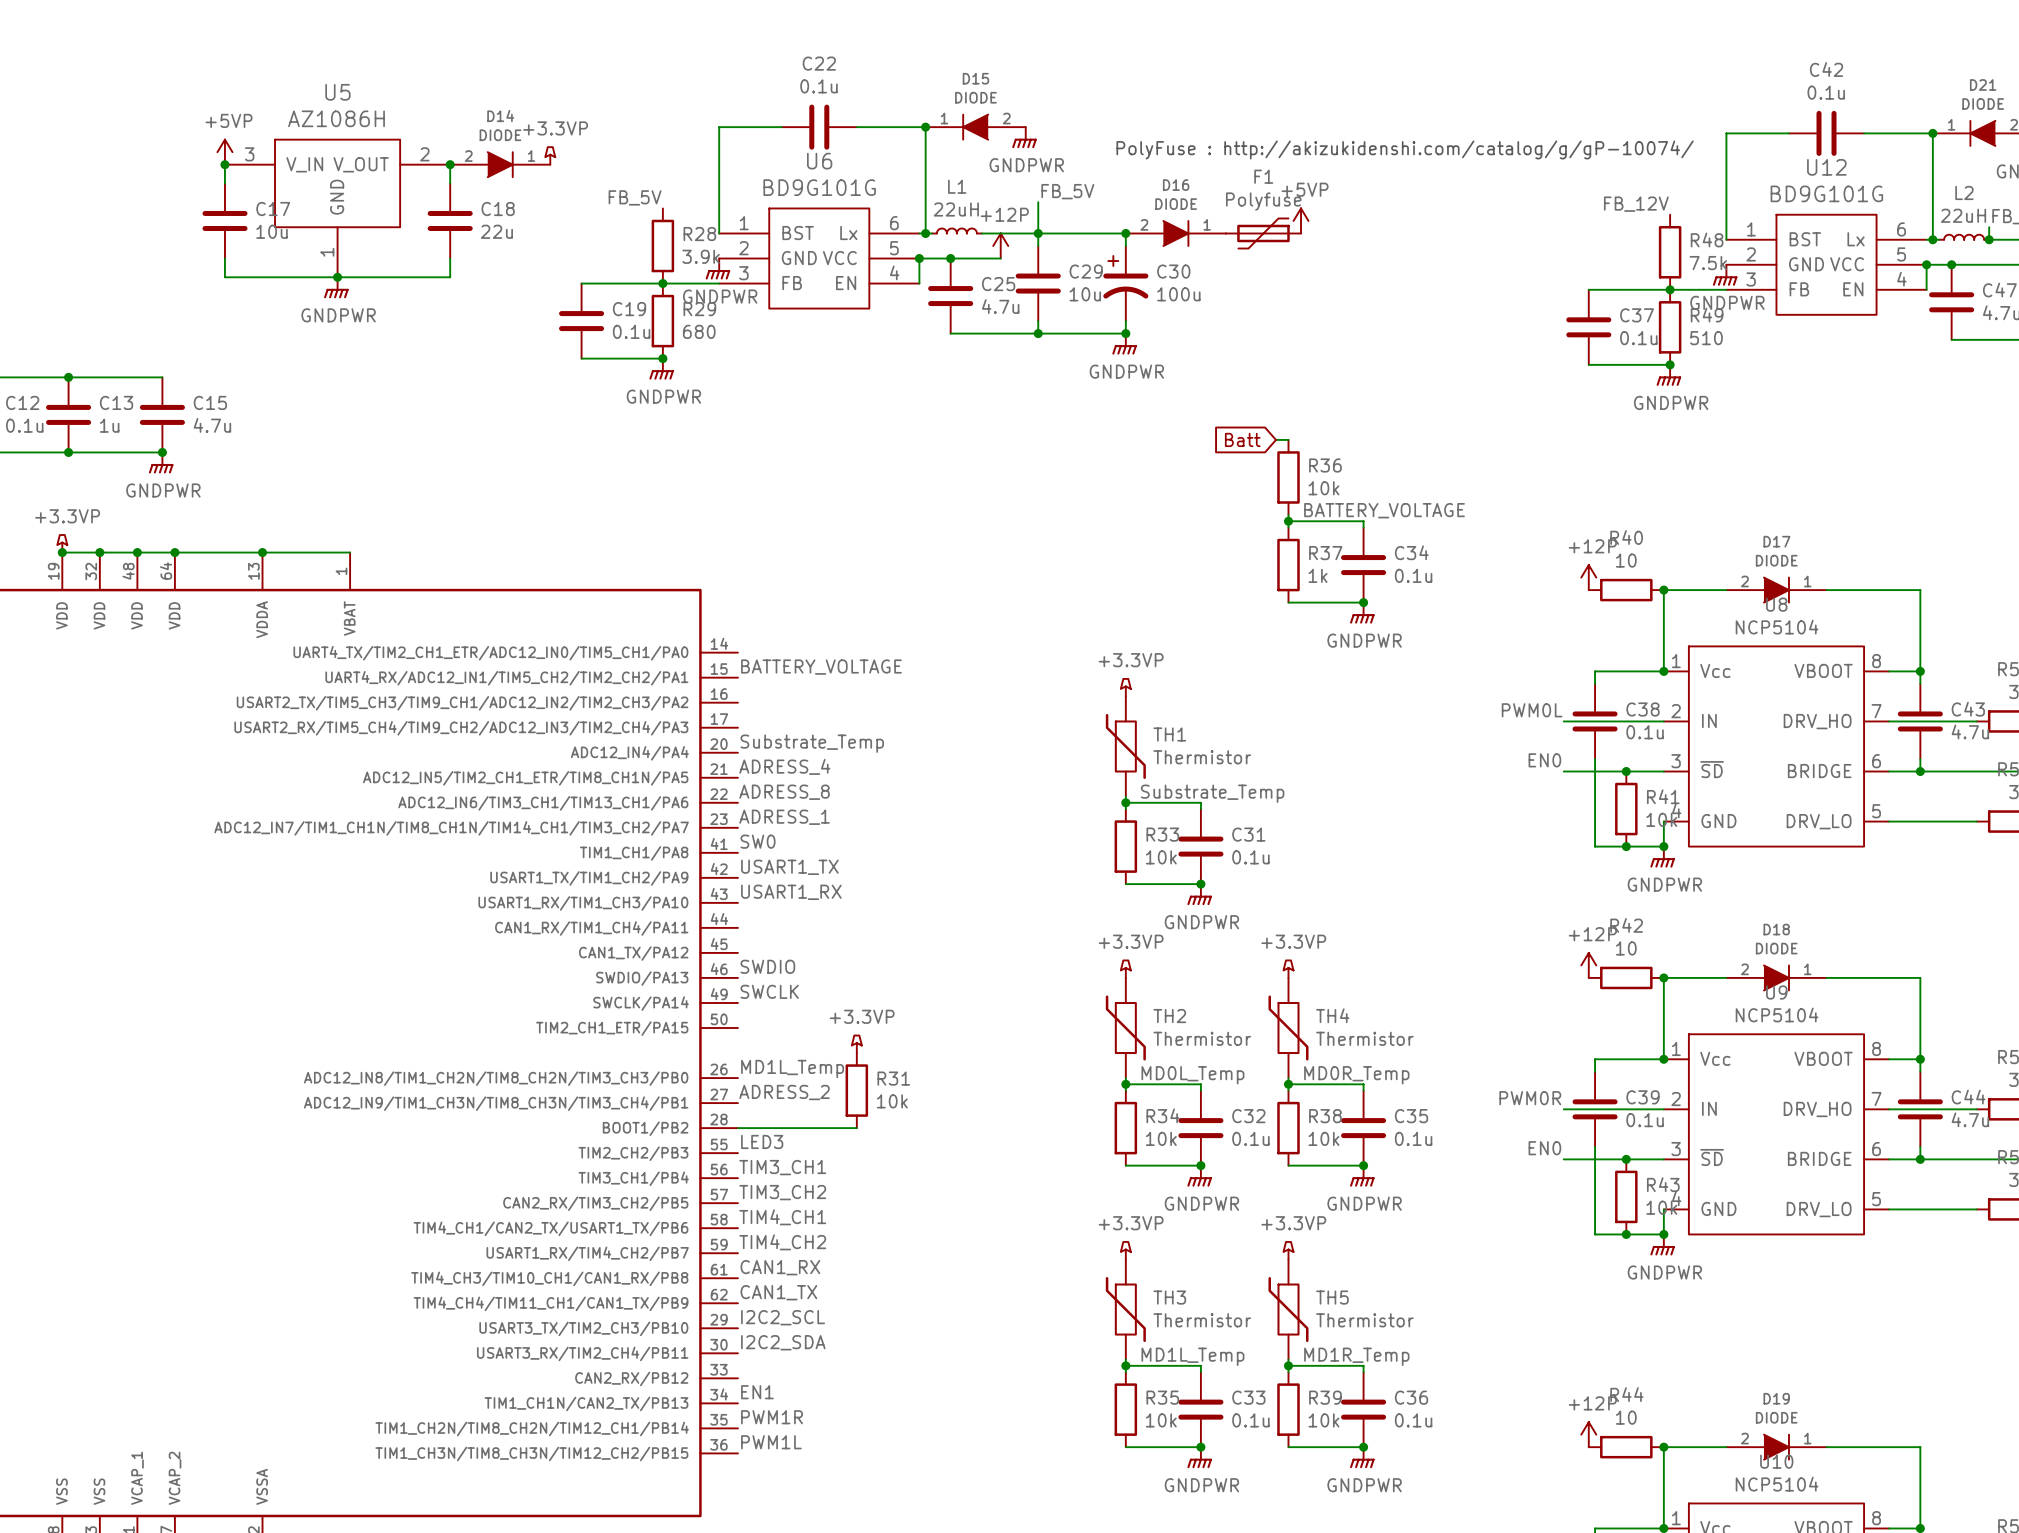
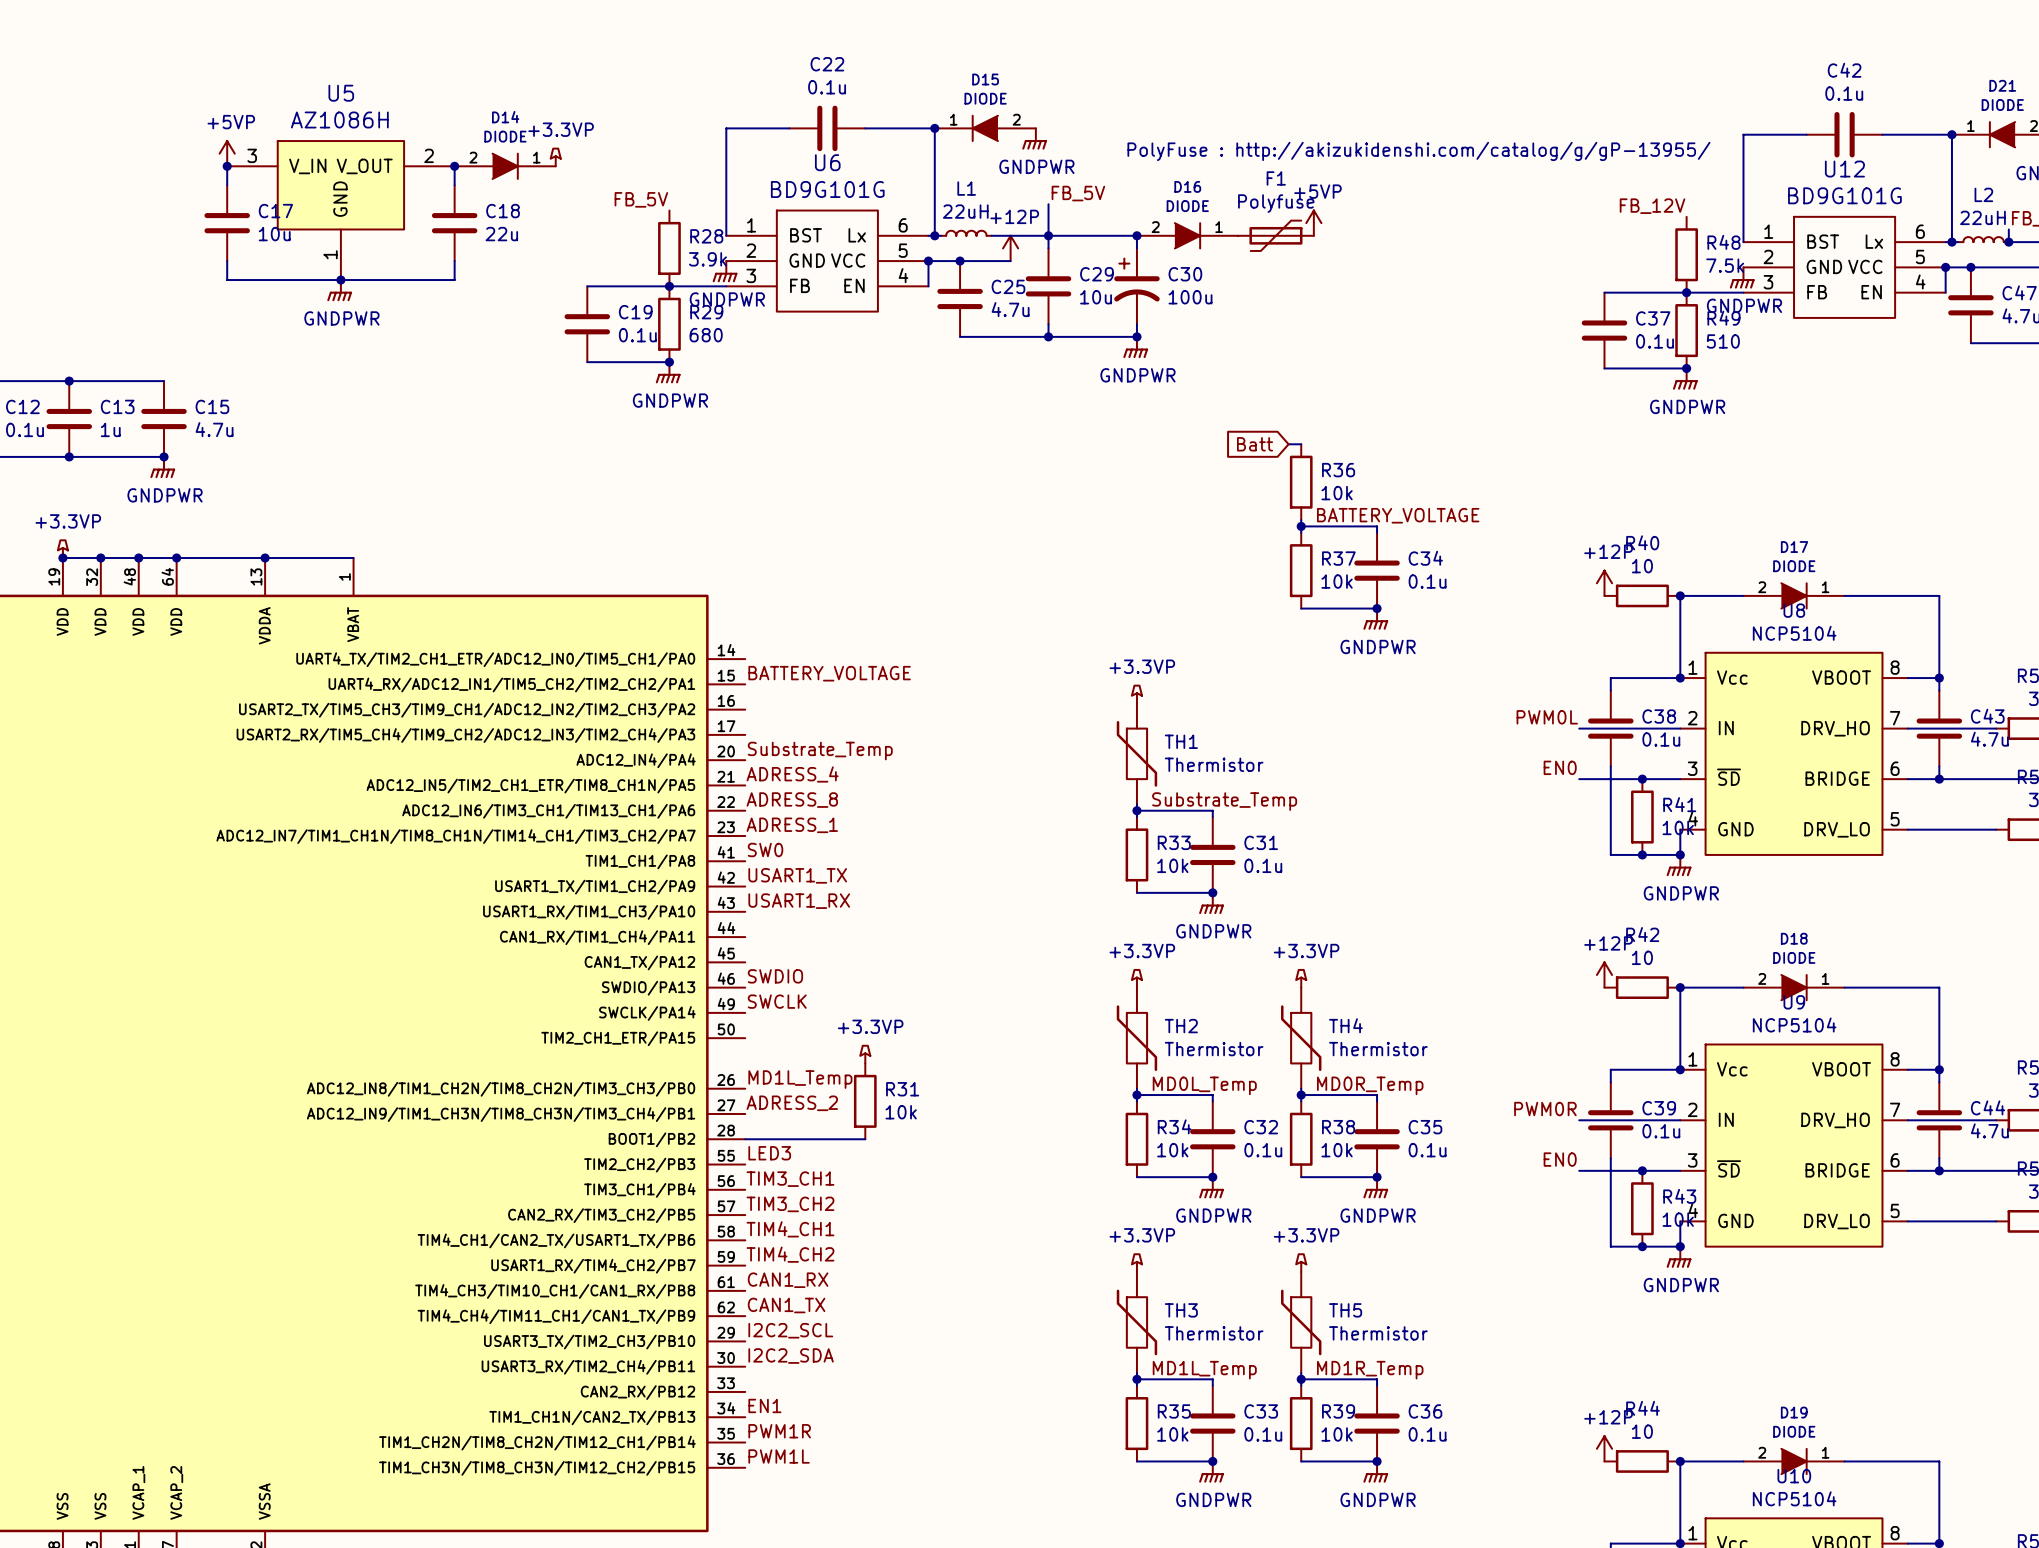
text: PolyFuse : http://akizukidenshi.com/catalog/g/gP-10074/ (1405, 149) -> PolyFuse : http://akizukidenshi.com/catalog/g/gP-13955/ (1418, 151)
R37 value: 1k (1318, 575) -> 10k (1337, 581)

